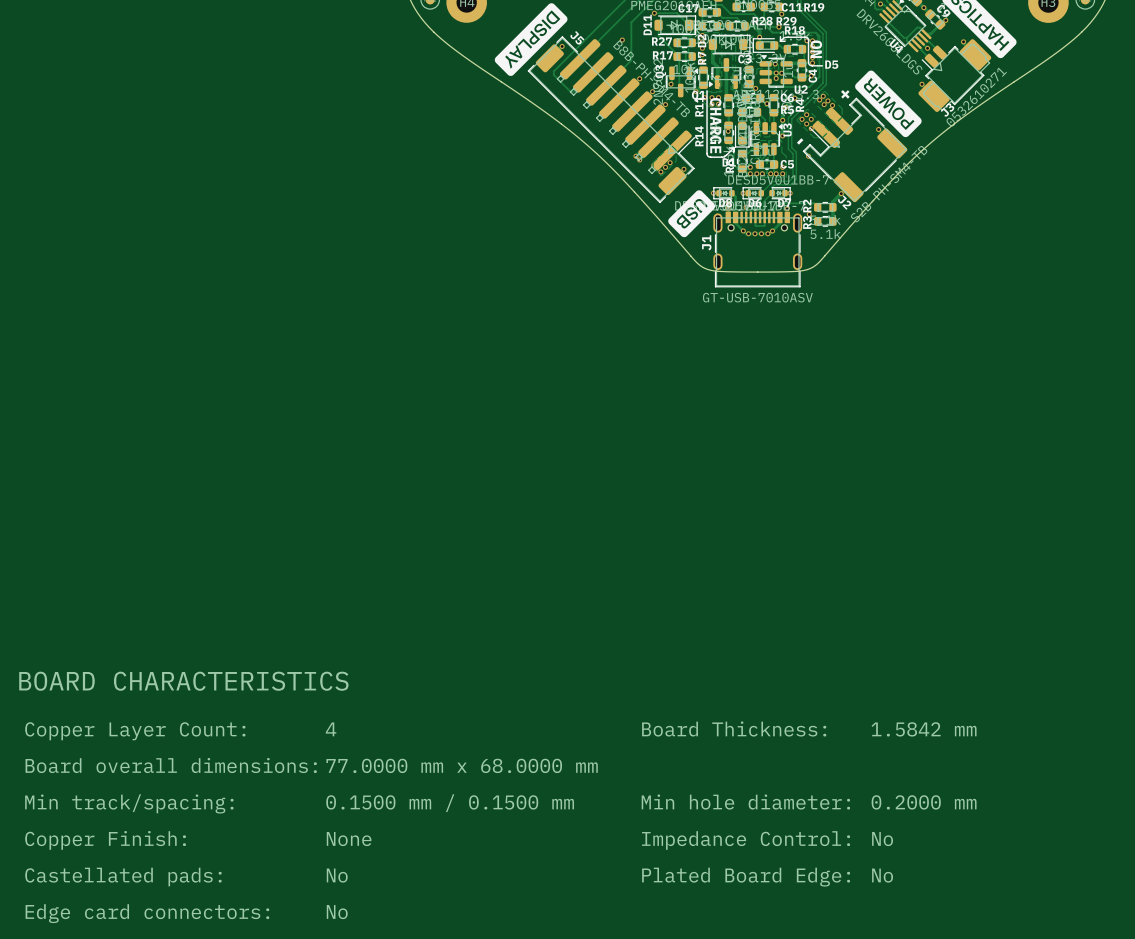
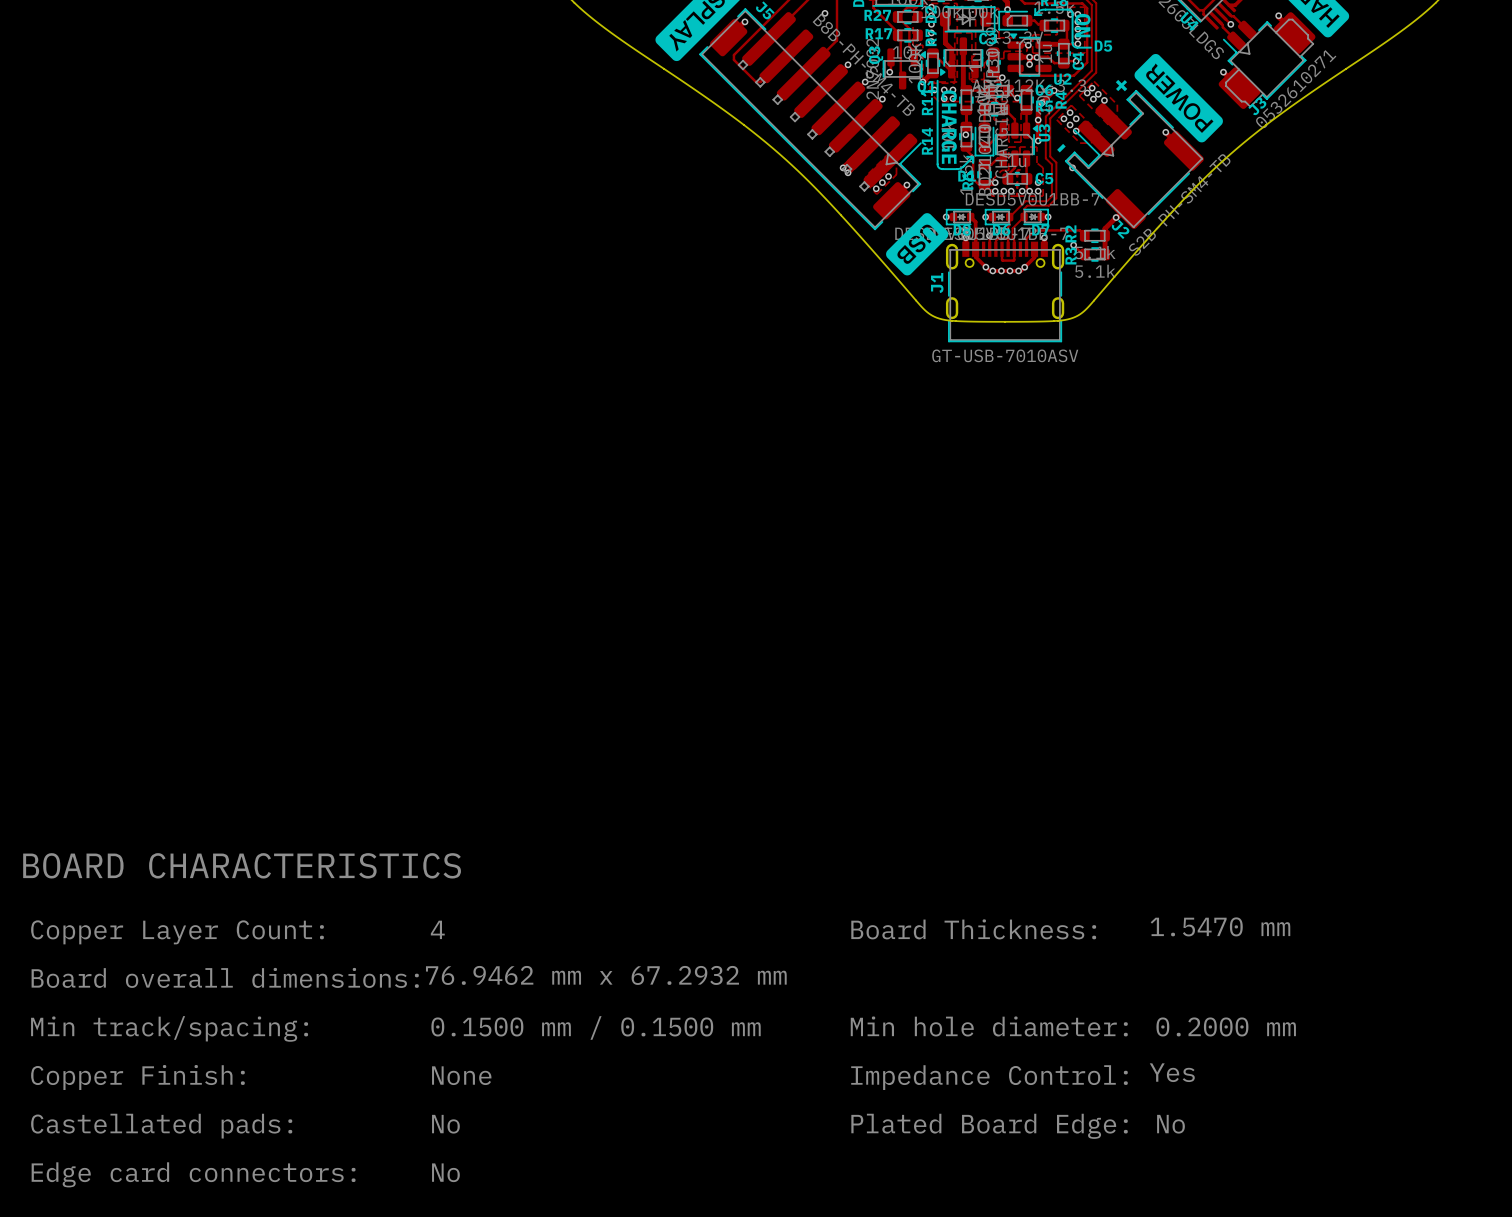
text: 1.5842 mm (924, 729) -> 1.5470 mm (1220, 926)
text: 77.0000 mm x 68.0000 mm (462, 765) -> 76.9462 mm x 67.2932 mm (606, 975)
text: No (882, 839) -> Yes (1172, 1072)

